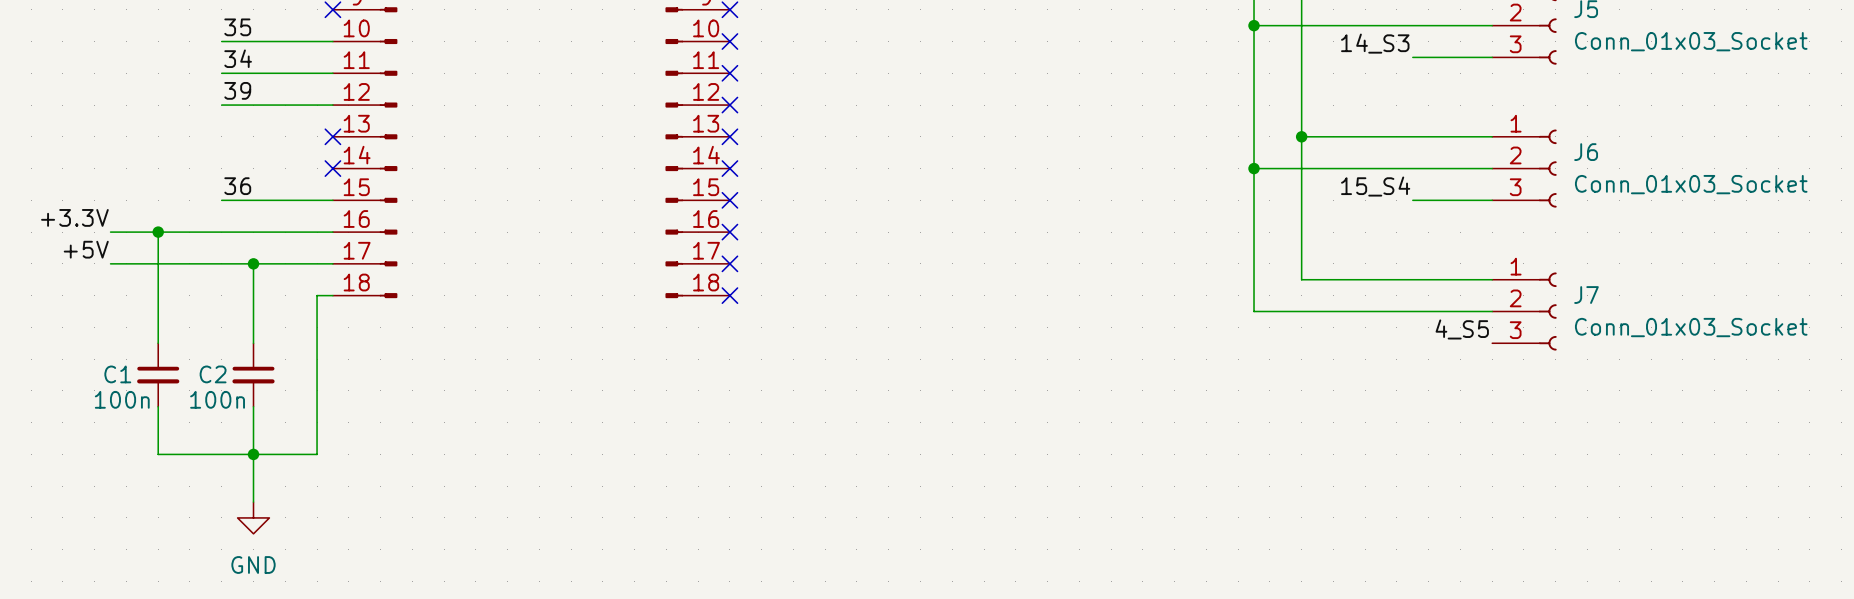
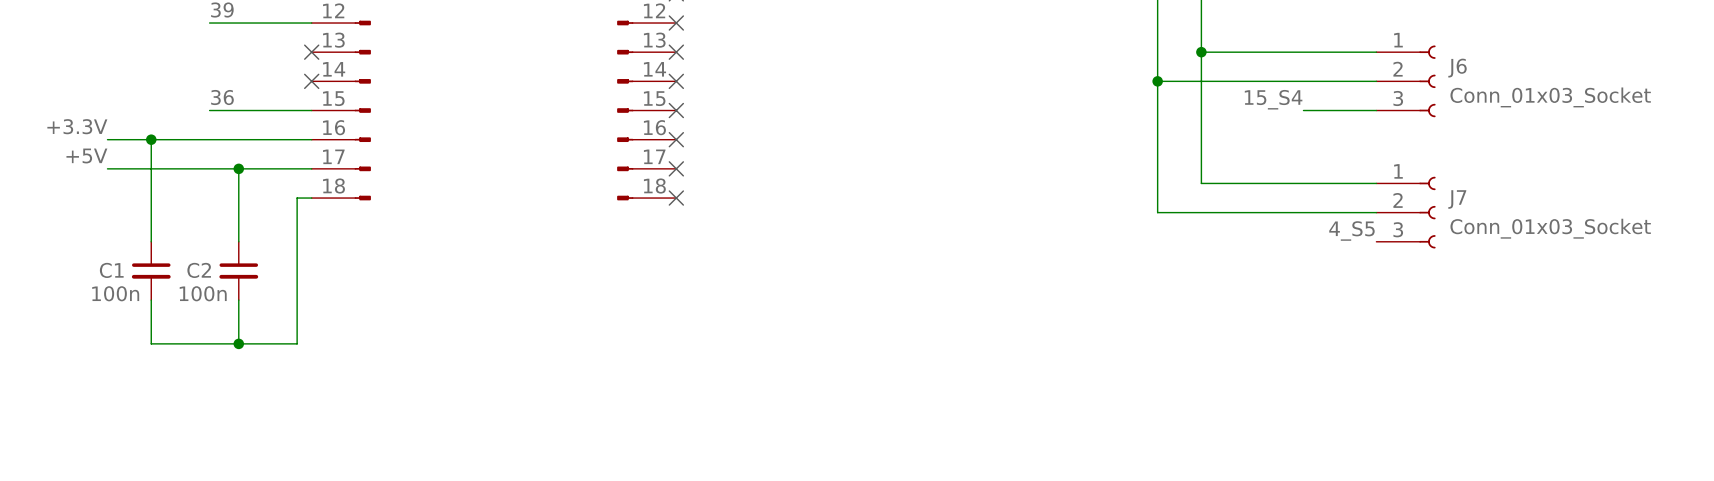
wire: (253, 454) (253, 502) -> none
power symbol: GND (253, 517) -> none

